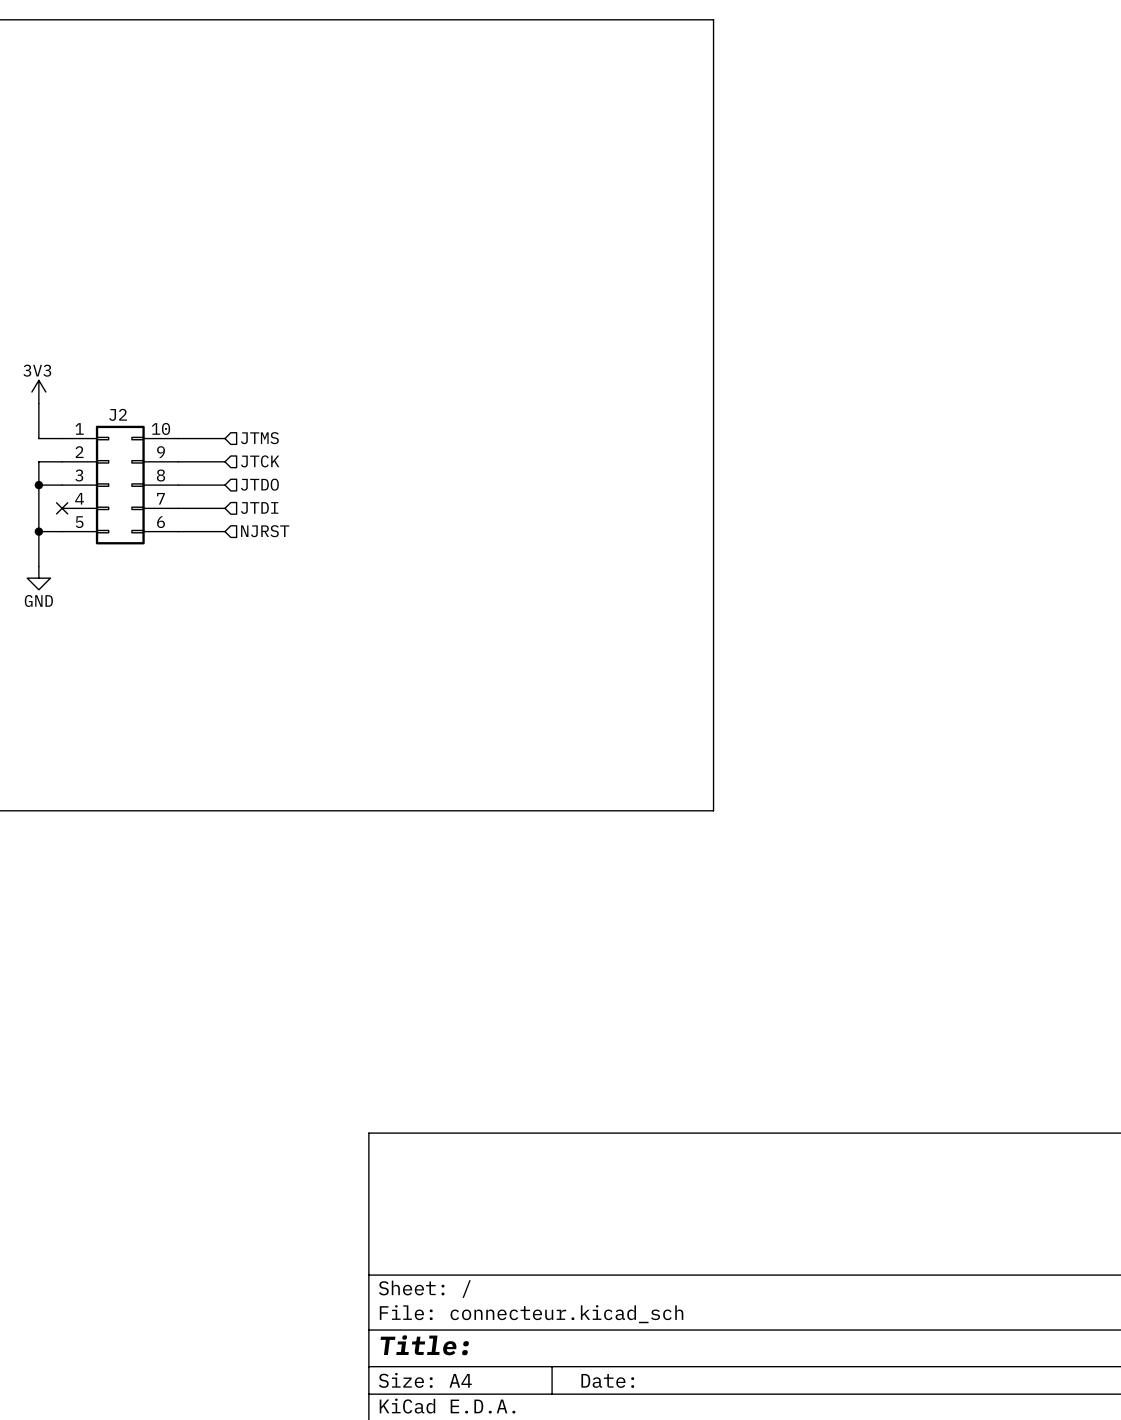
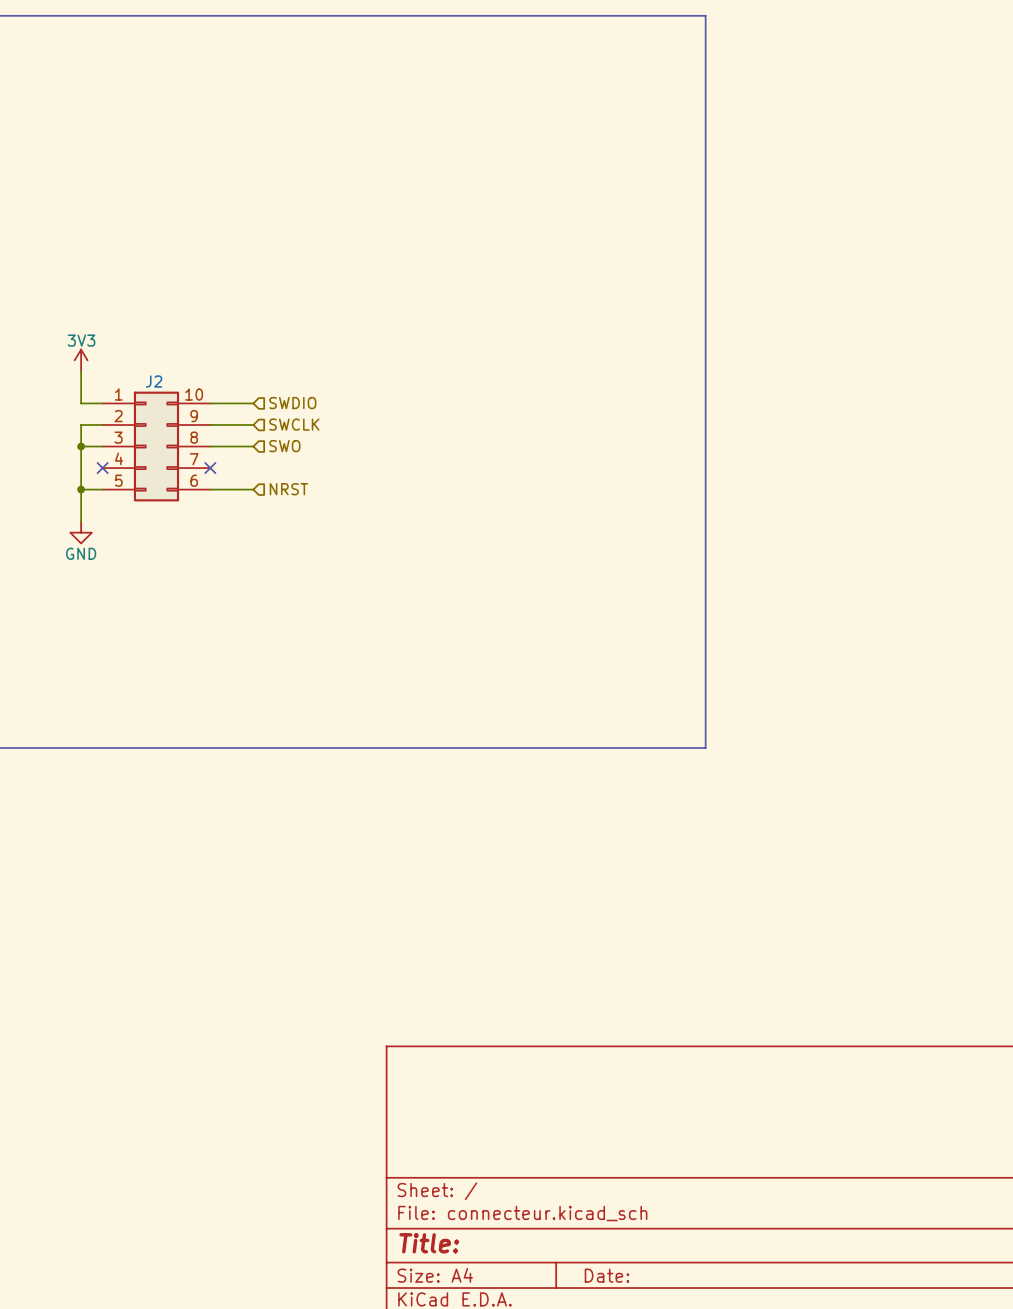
hierarchical label: JTMS (259, 438) -> SWDIO (292, 403)
hierarchical label: JTCK (260, 461) -> SWCLK (294, 424)
hierarchical label: JTDO (259, 484) -> SWO (284, 446)
wire: (178, 508) (224, 508) -> none
no-connect mark: none -> (210, 468)
hierarchical label: JTDI (259, 508) -> none
hierarchical label: NJRST (265, 531) -> NRST (288, 489)

